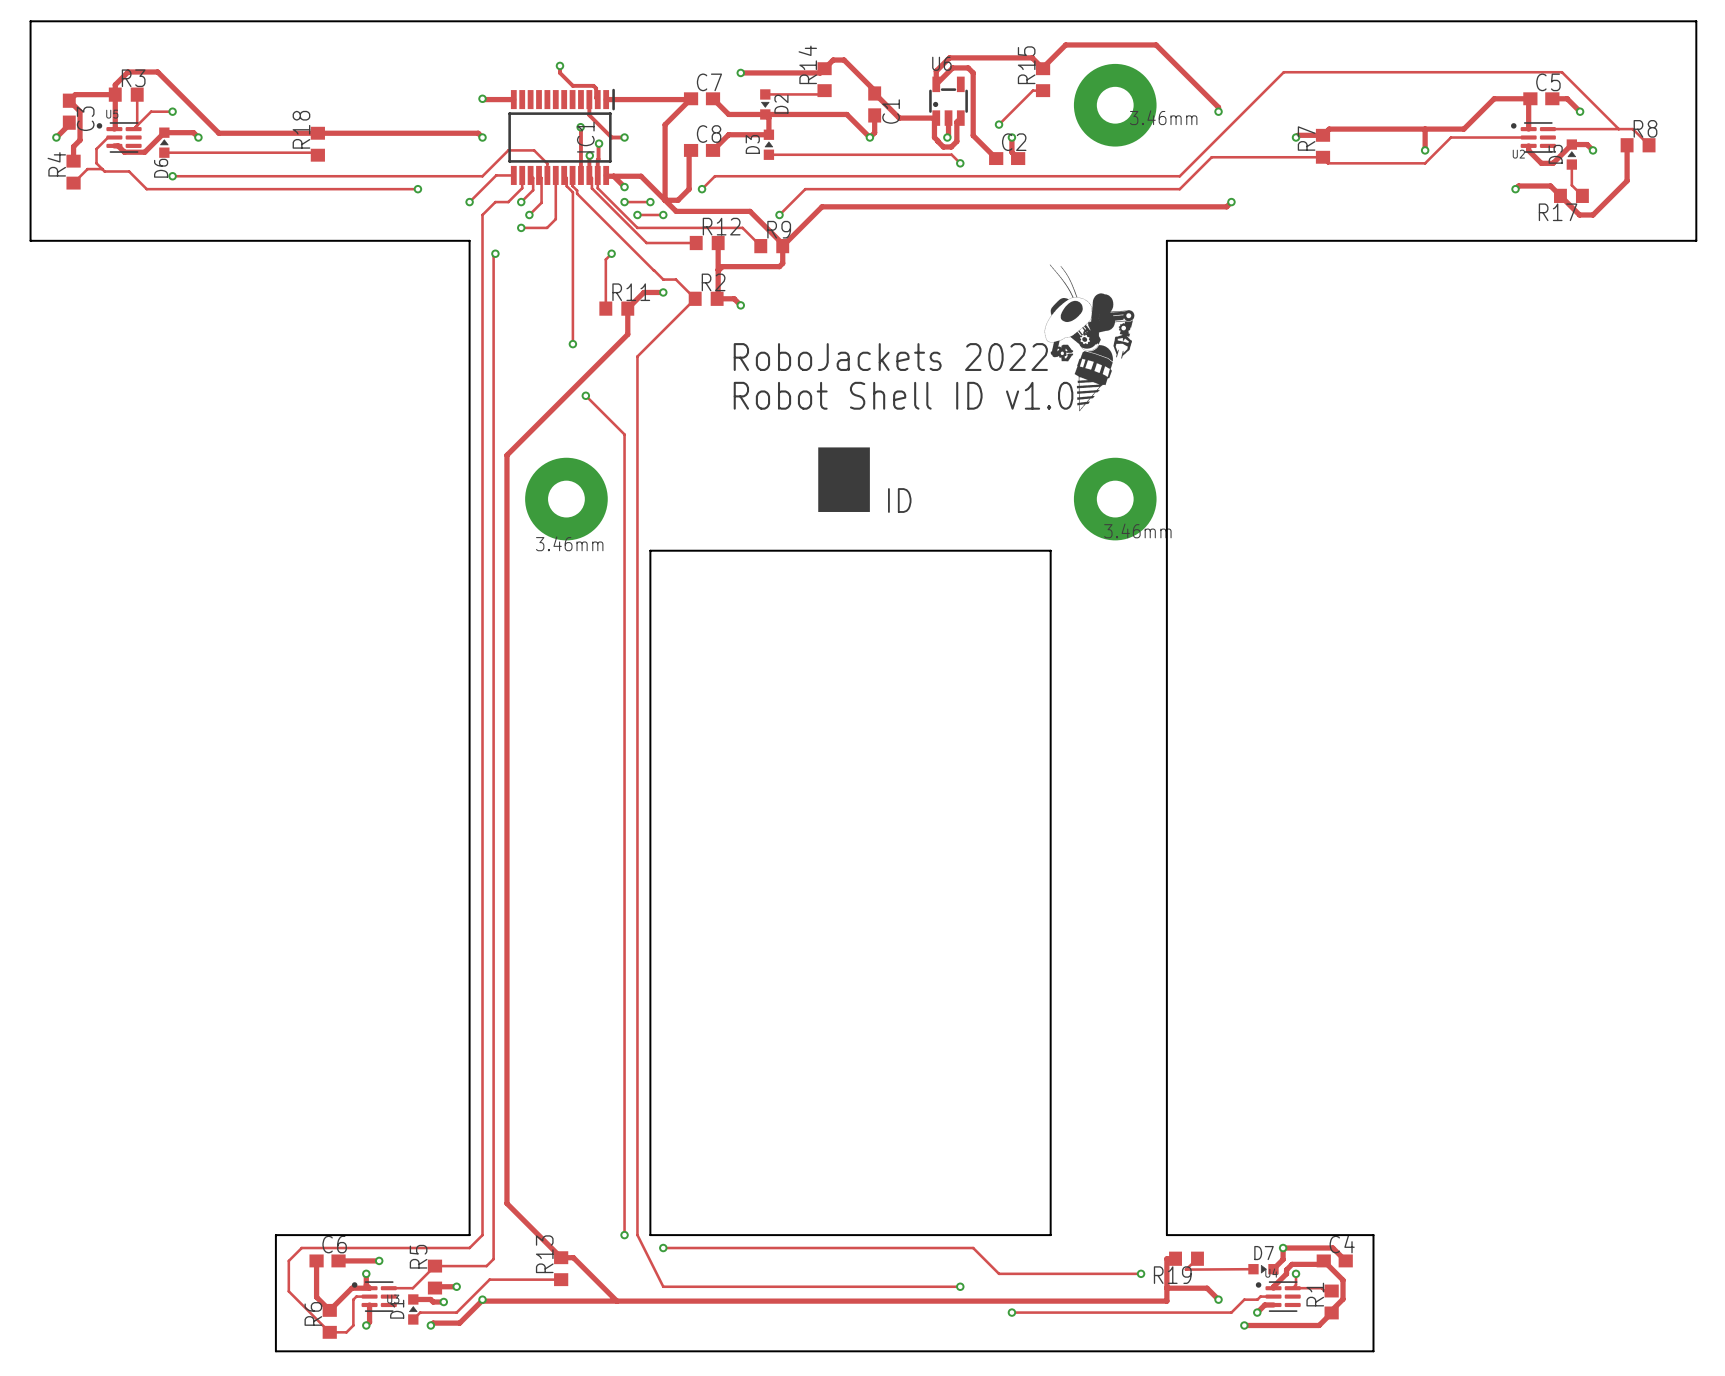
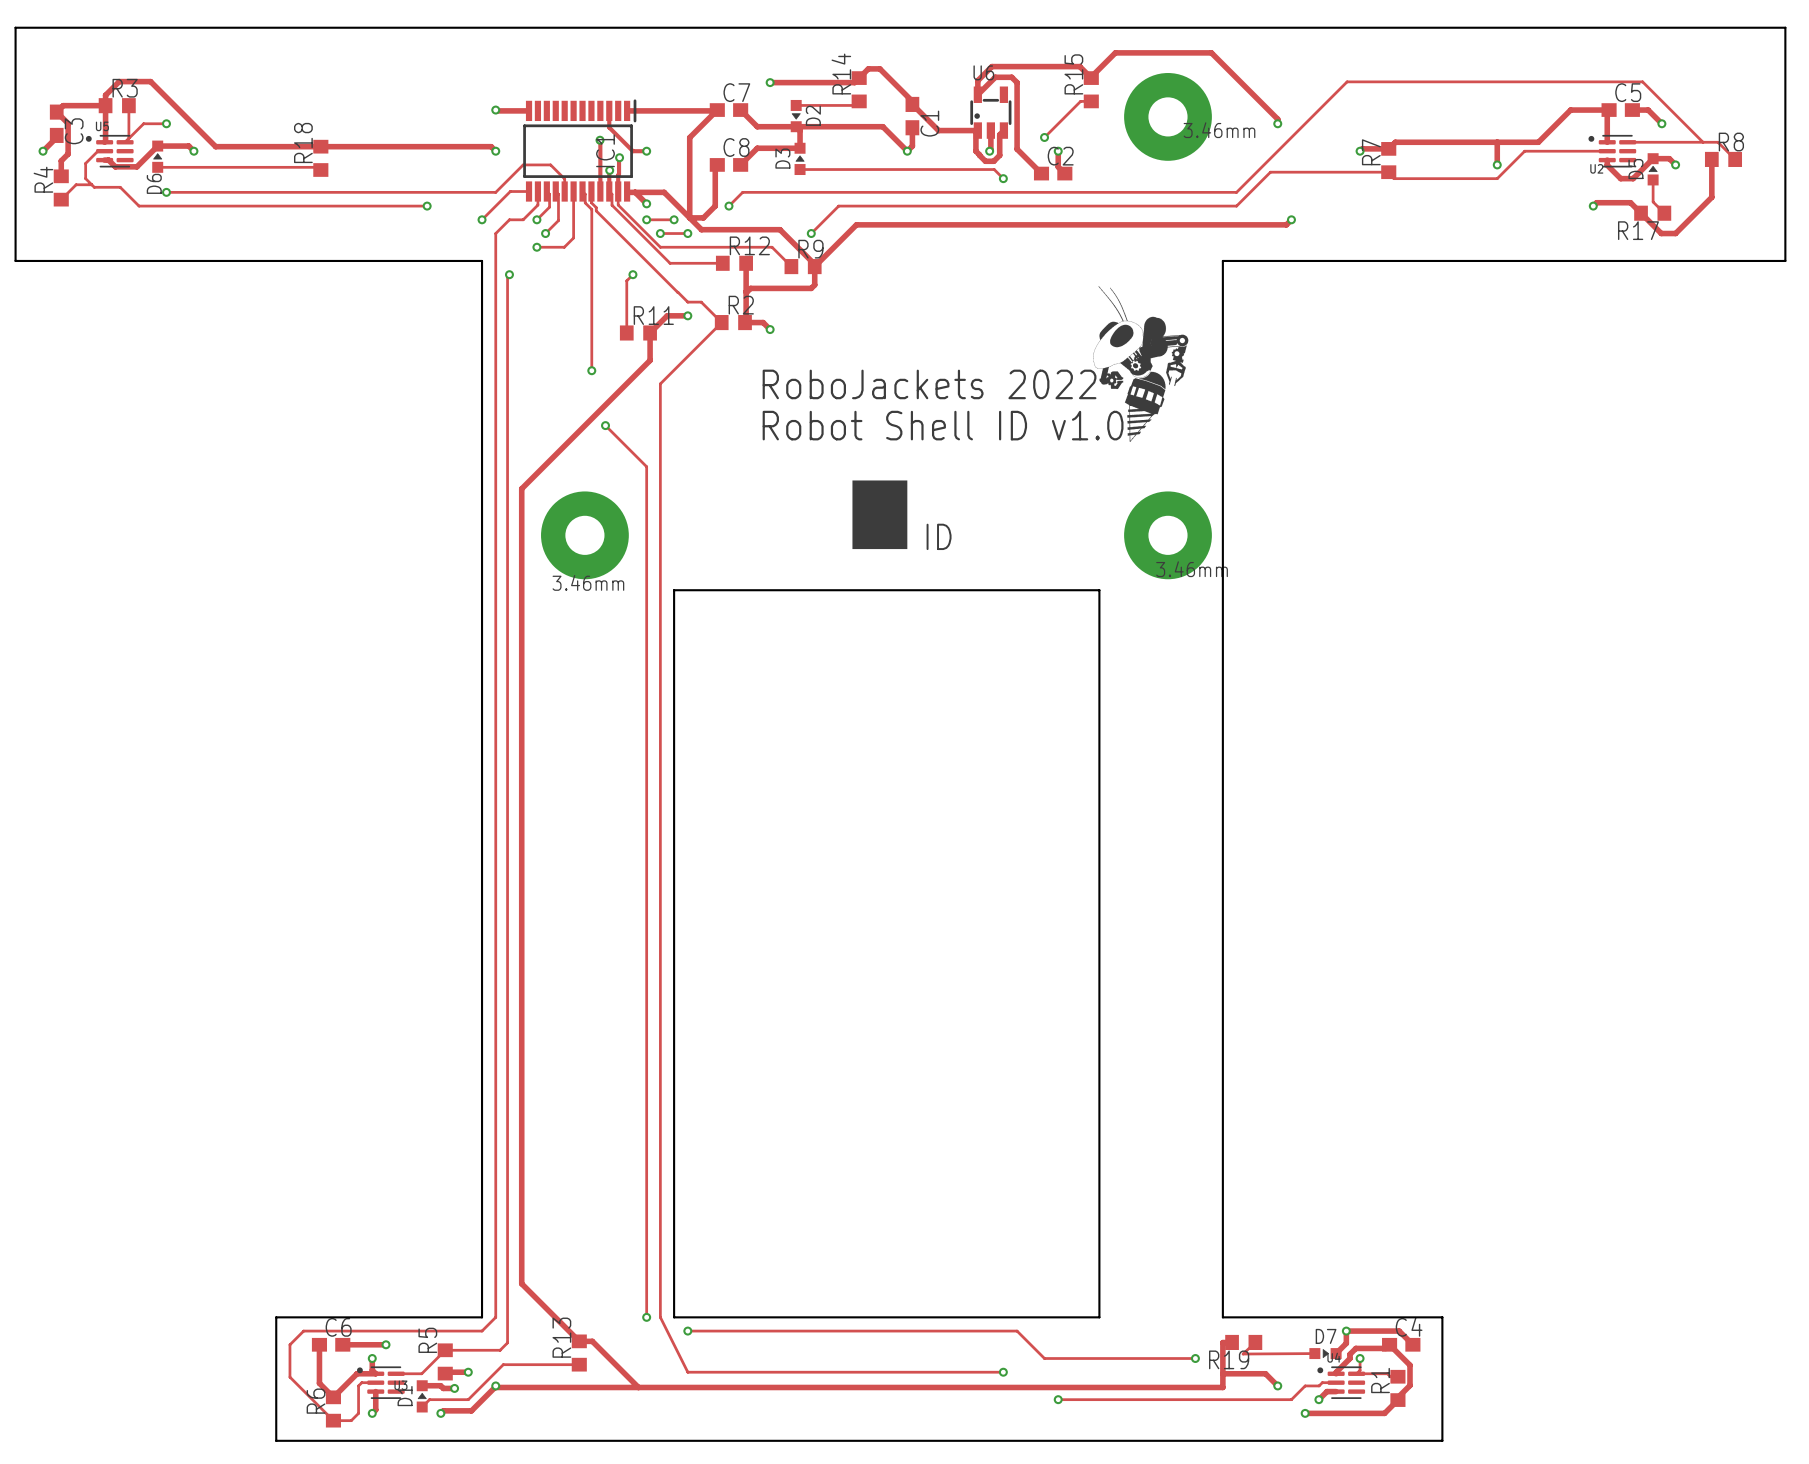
track: (559, 65) (559, 72) (572, 85) (593, 85) (596, 88) (597, 99) -> none
via: (559, 65) -> none

